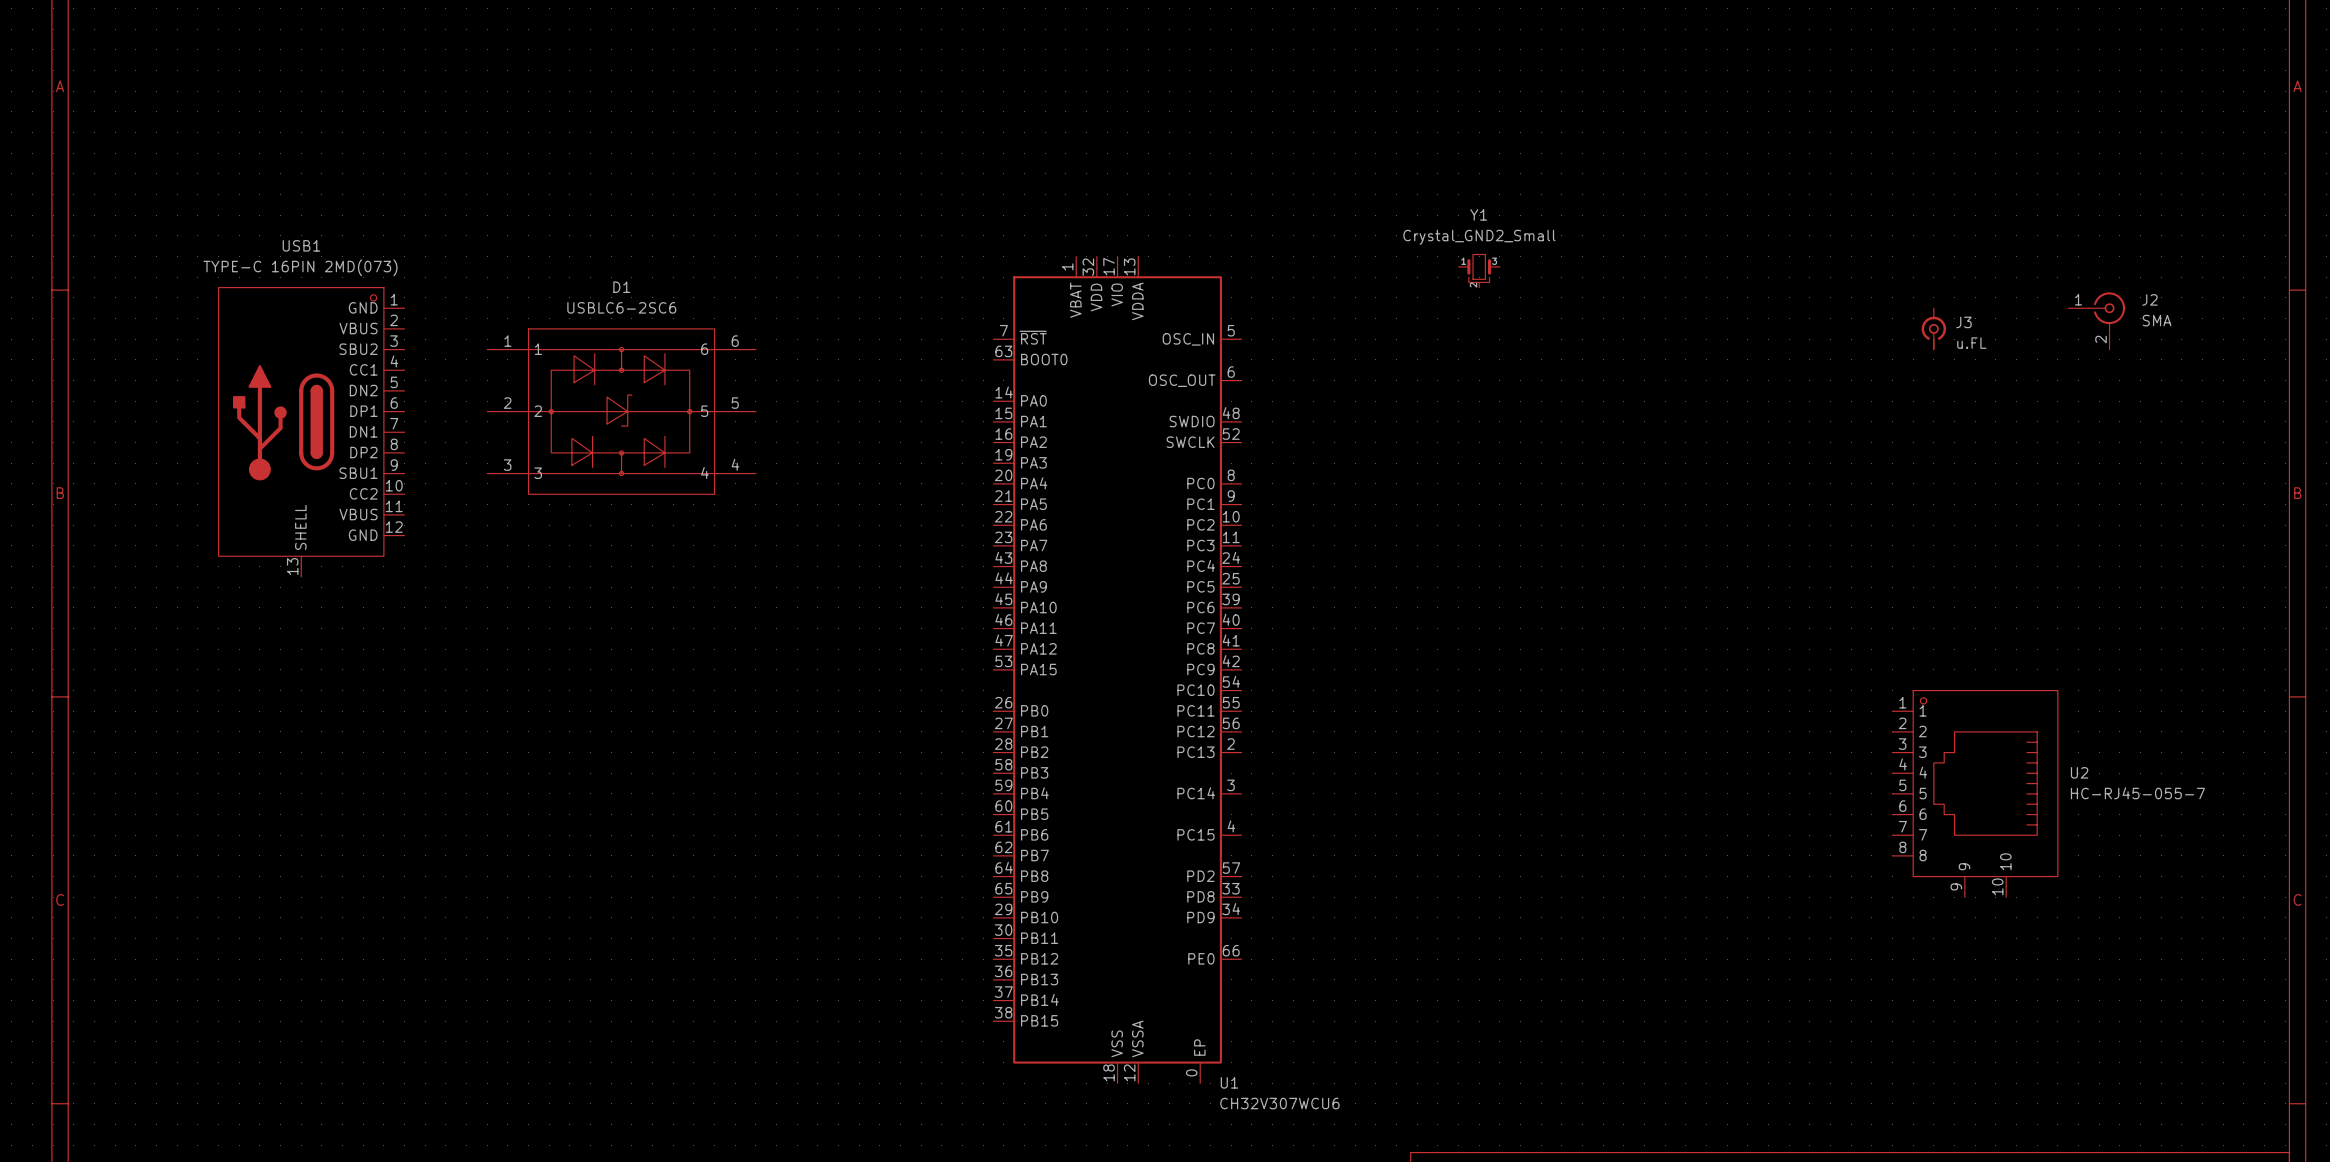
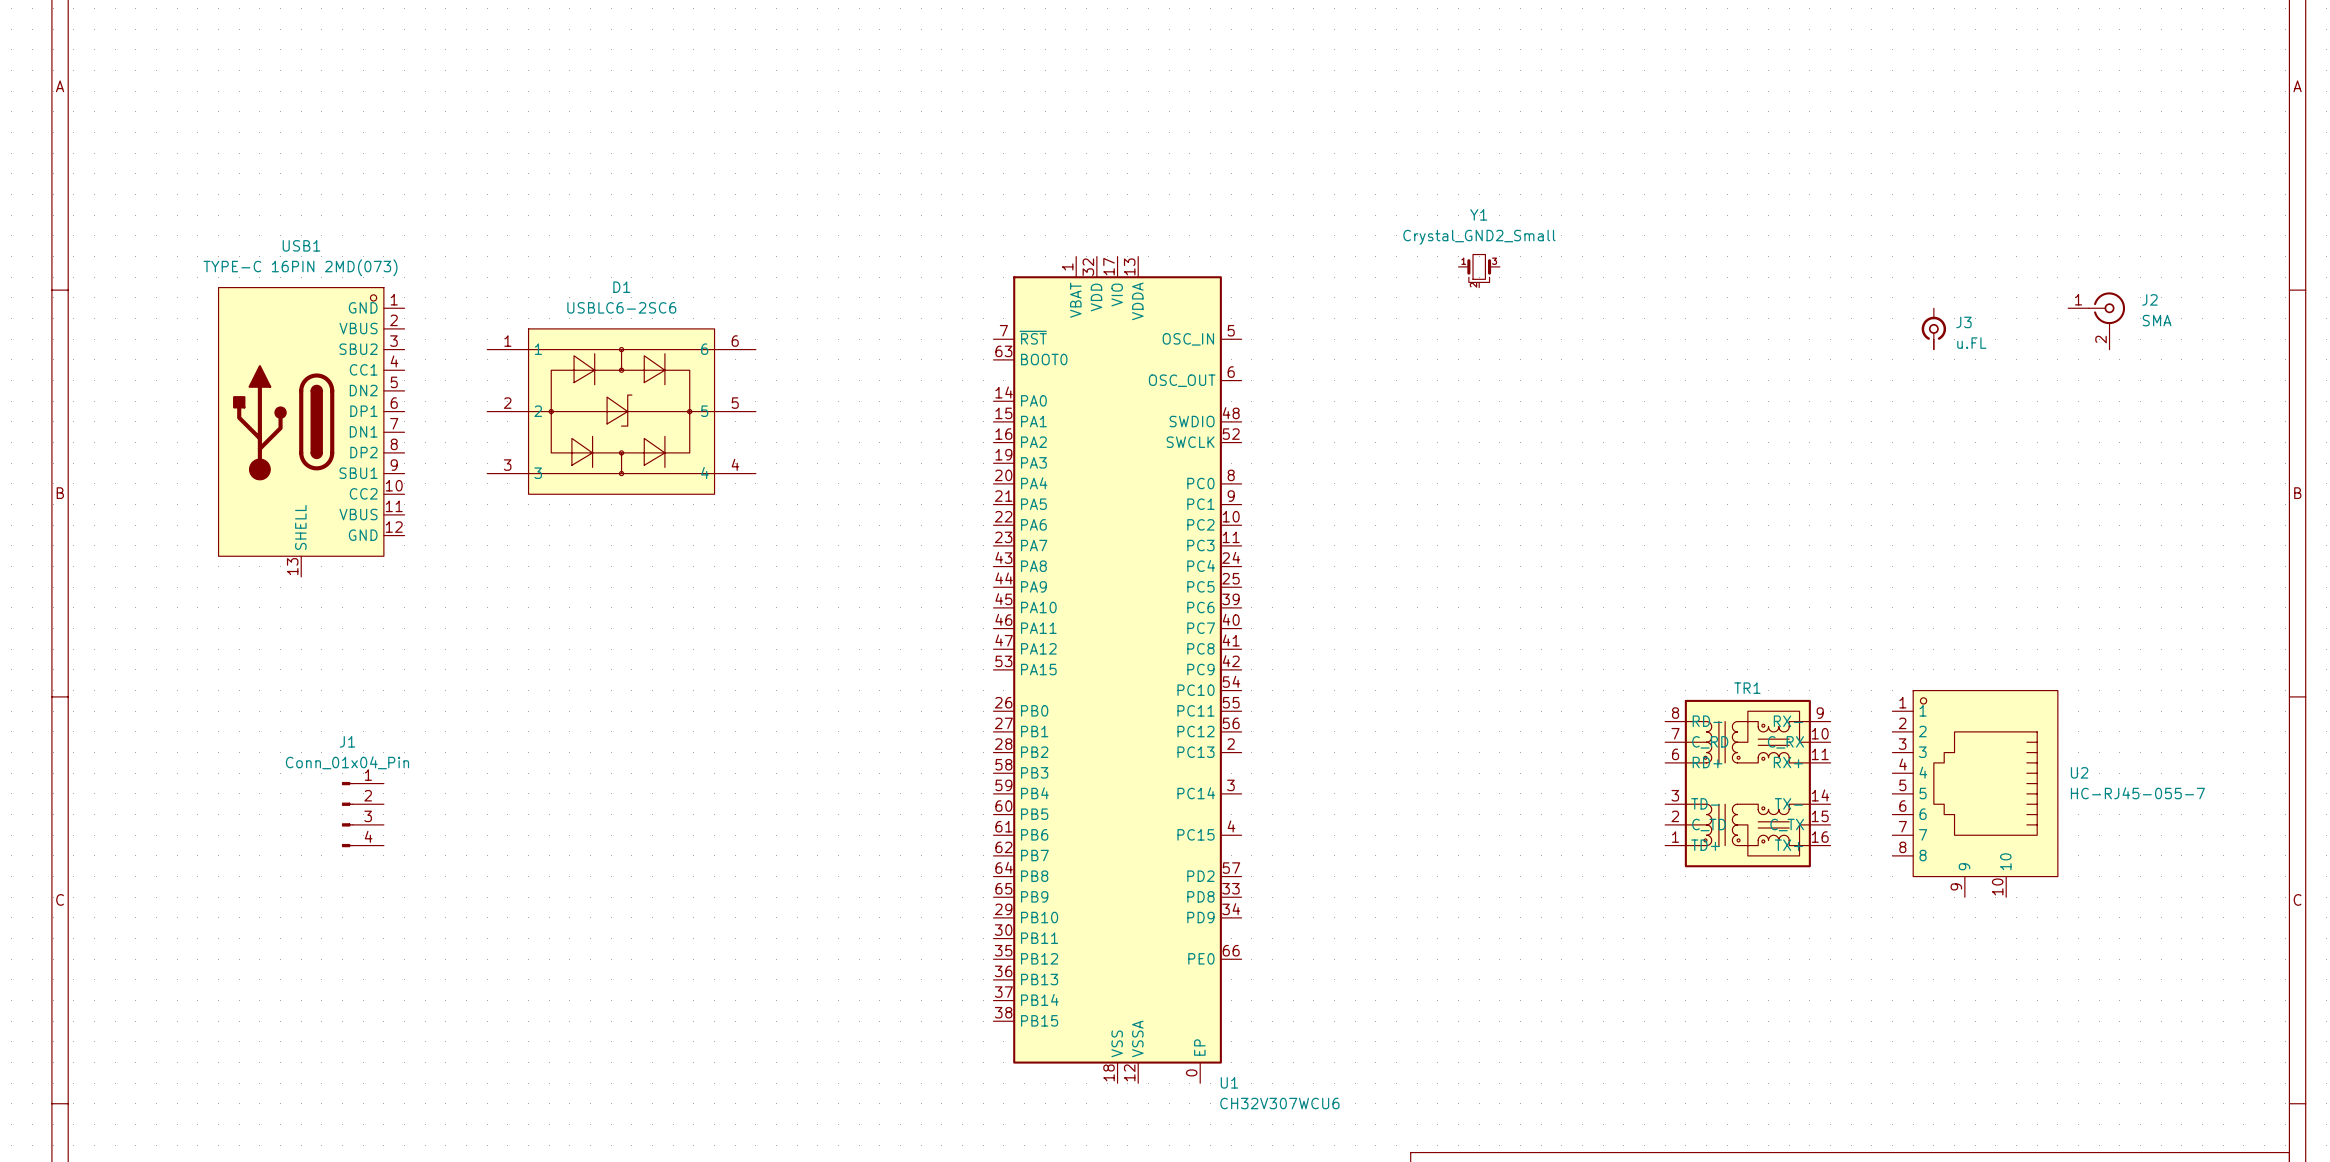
TR1: none -> (1747, 783)
J1: none -> Conn_01x04_Pin (362, 814)

